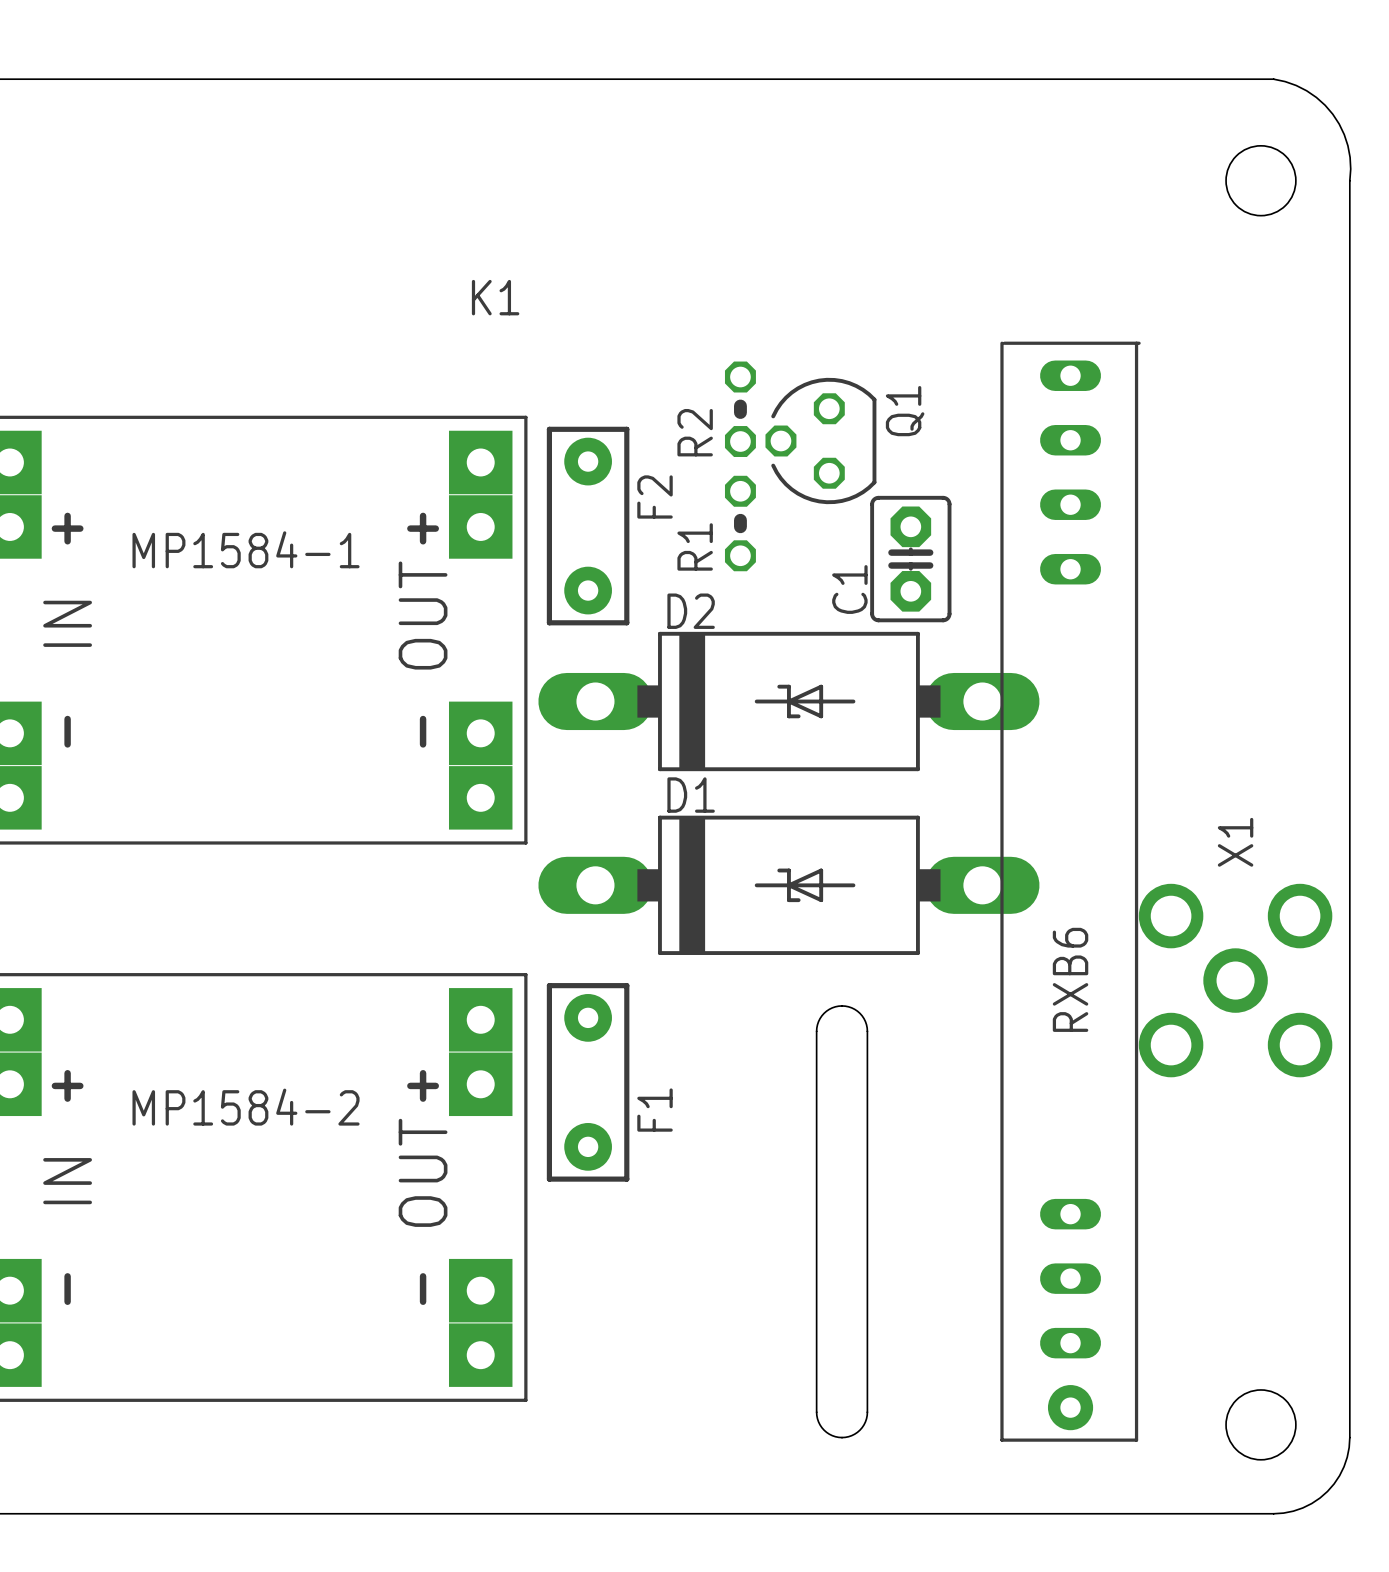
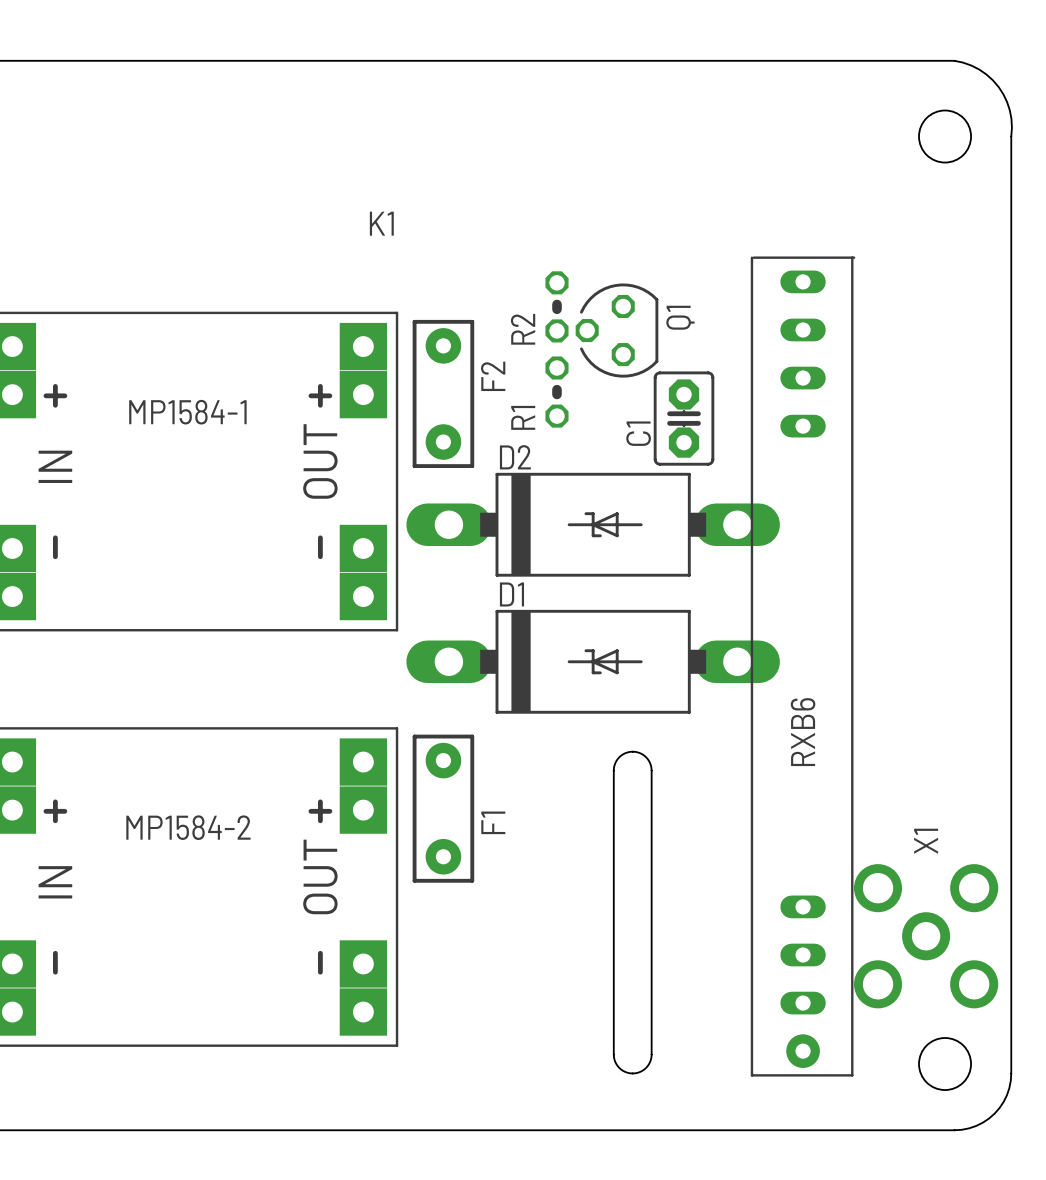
X1 position: (1235, 980) -> (926, 936)

